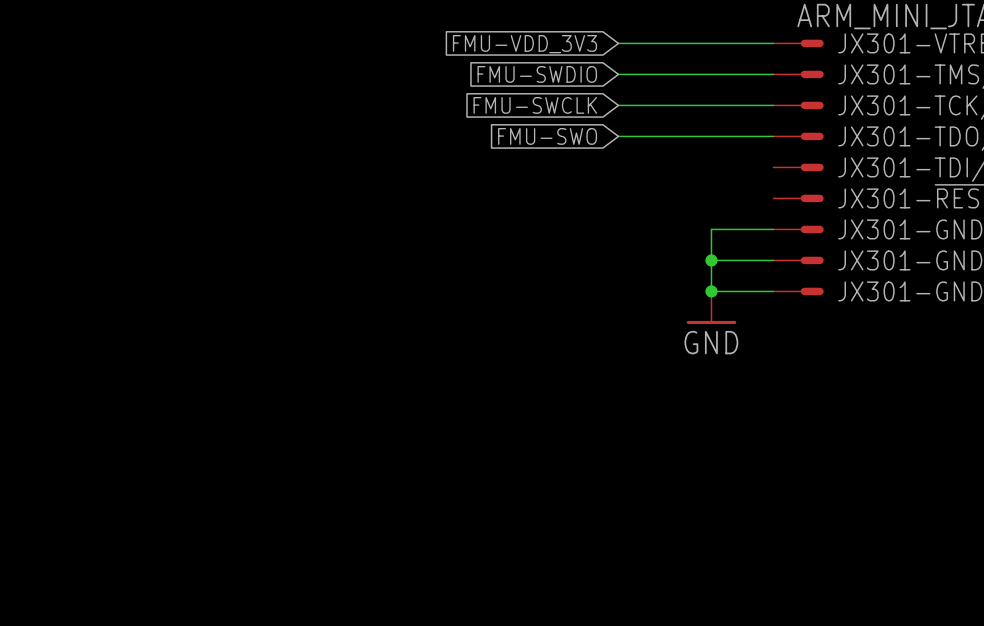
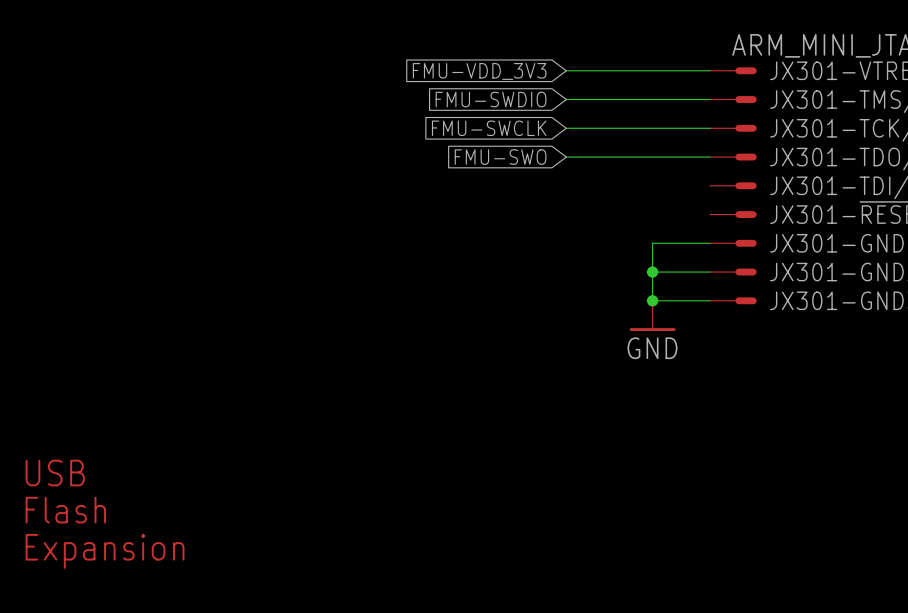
text: none -> USB (55, 473)
text: none -> Flash (65, 510)
text: none -> Expansion (105, 551)

